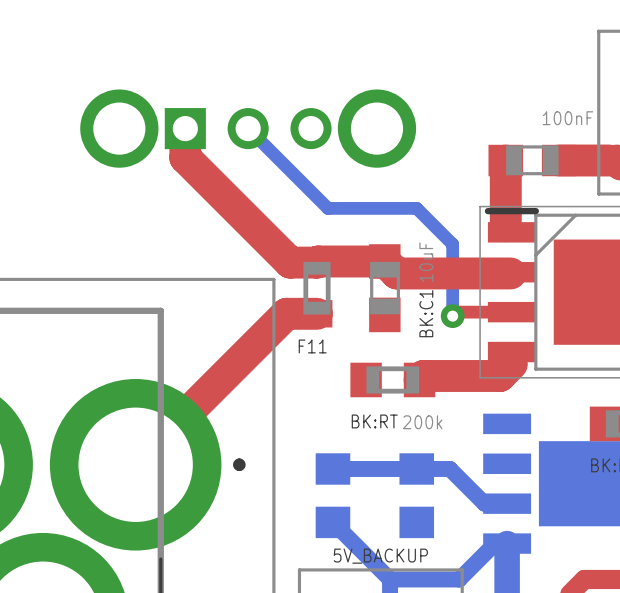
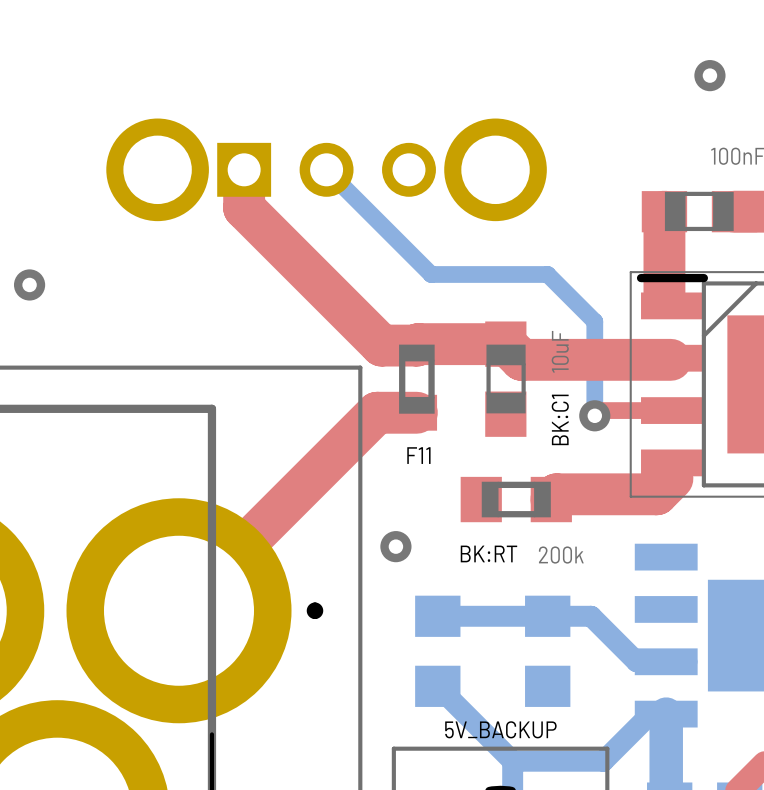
via: none -> (709, 75)
via: none -> (29, 284)
via: none -> (395, 546)

